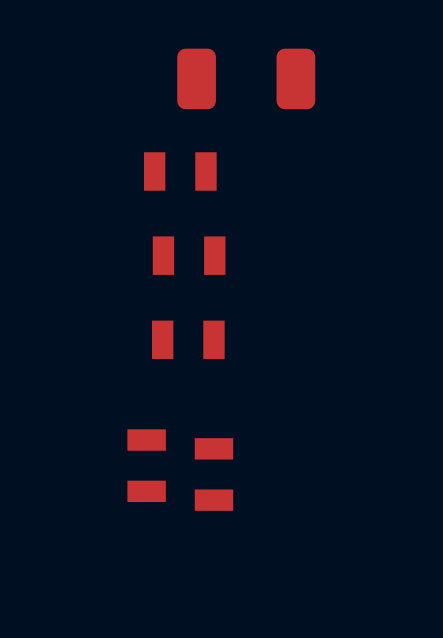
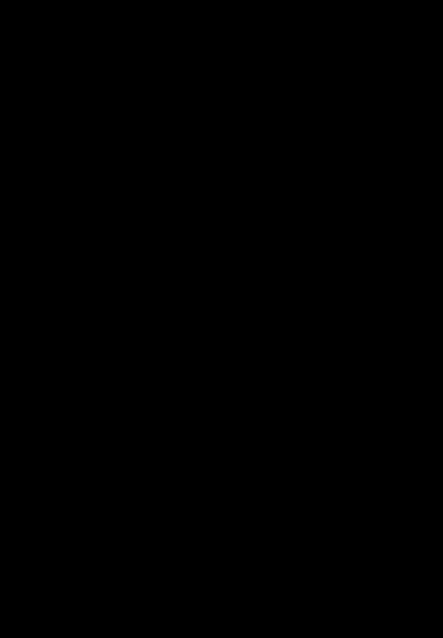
part: (246, 78) -> none
part: (180, 171) -> none
part: (189, 255) -> none
part: (188, 339) -> none
part: (146, 465) -> none
part: (213, 474) -> none

